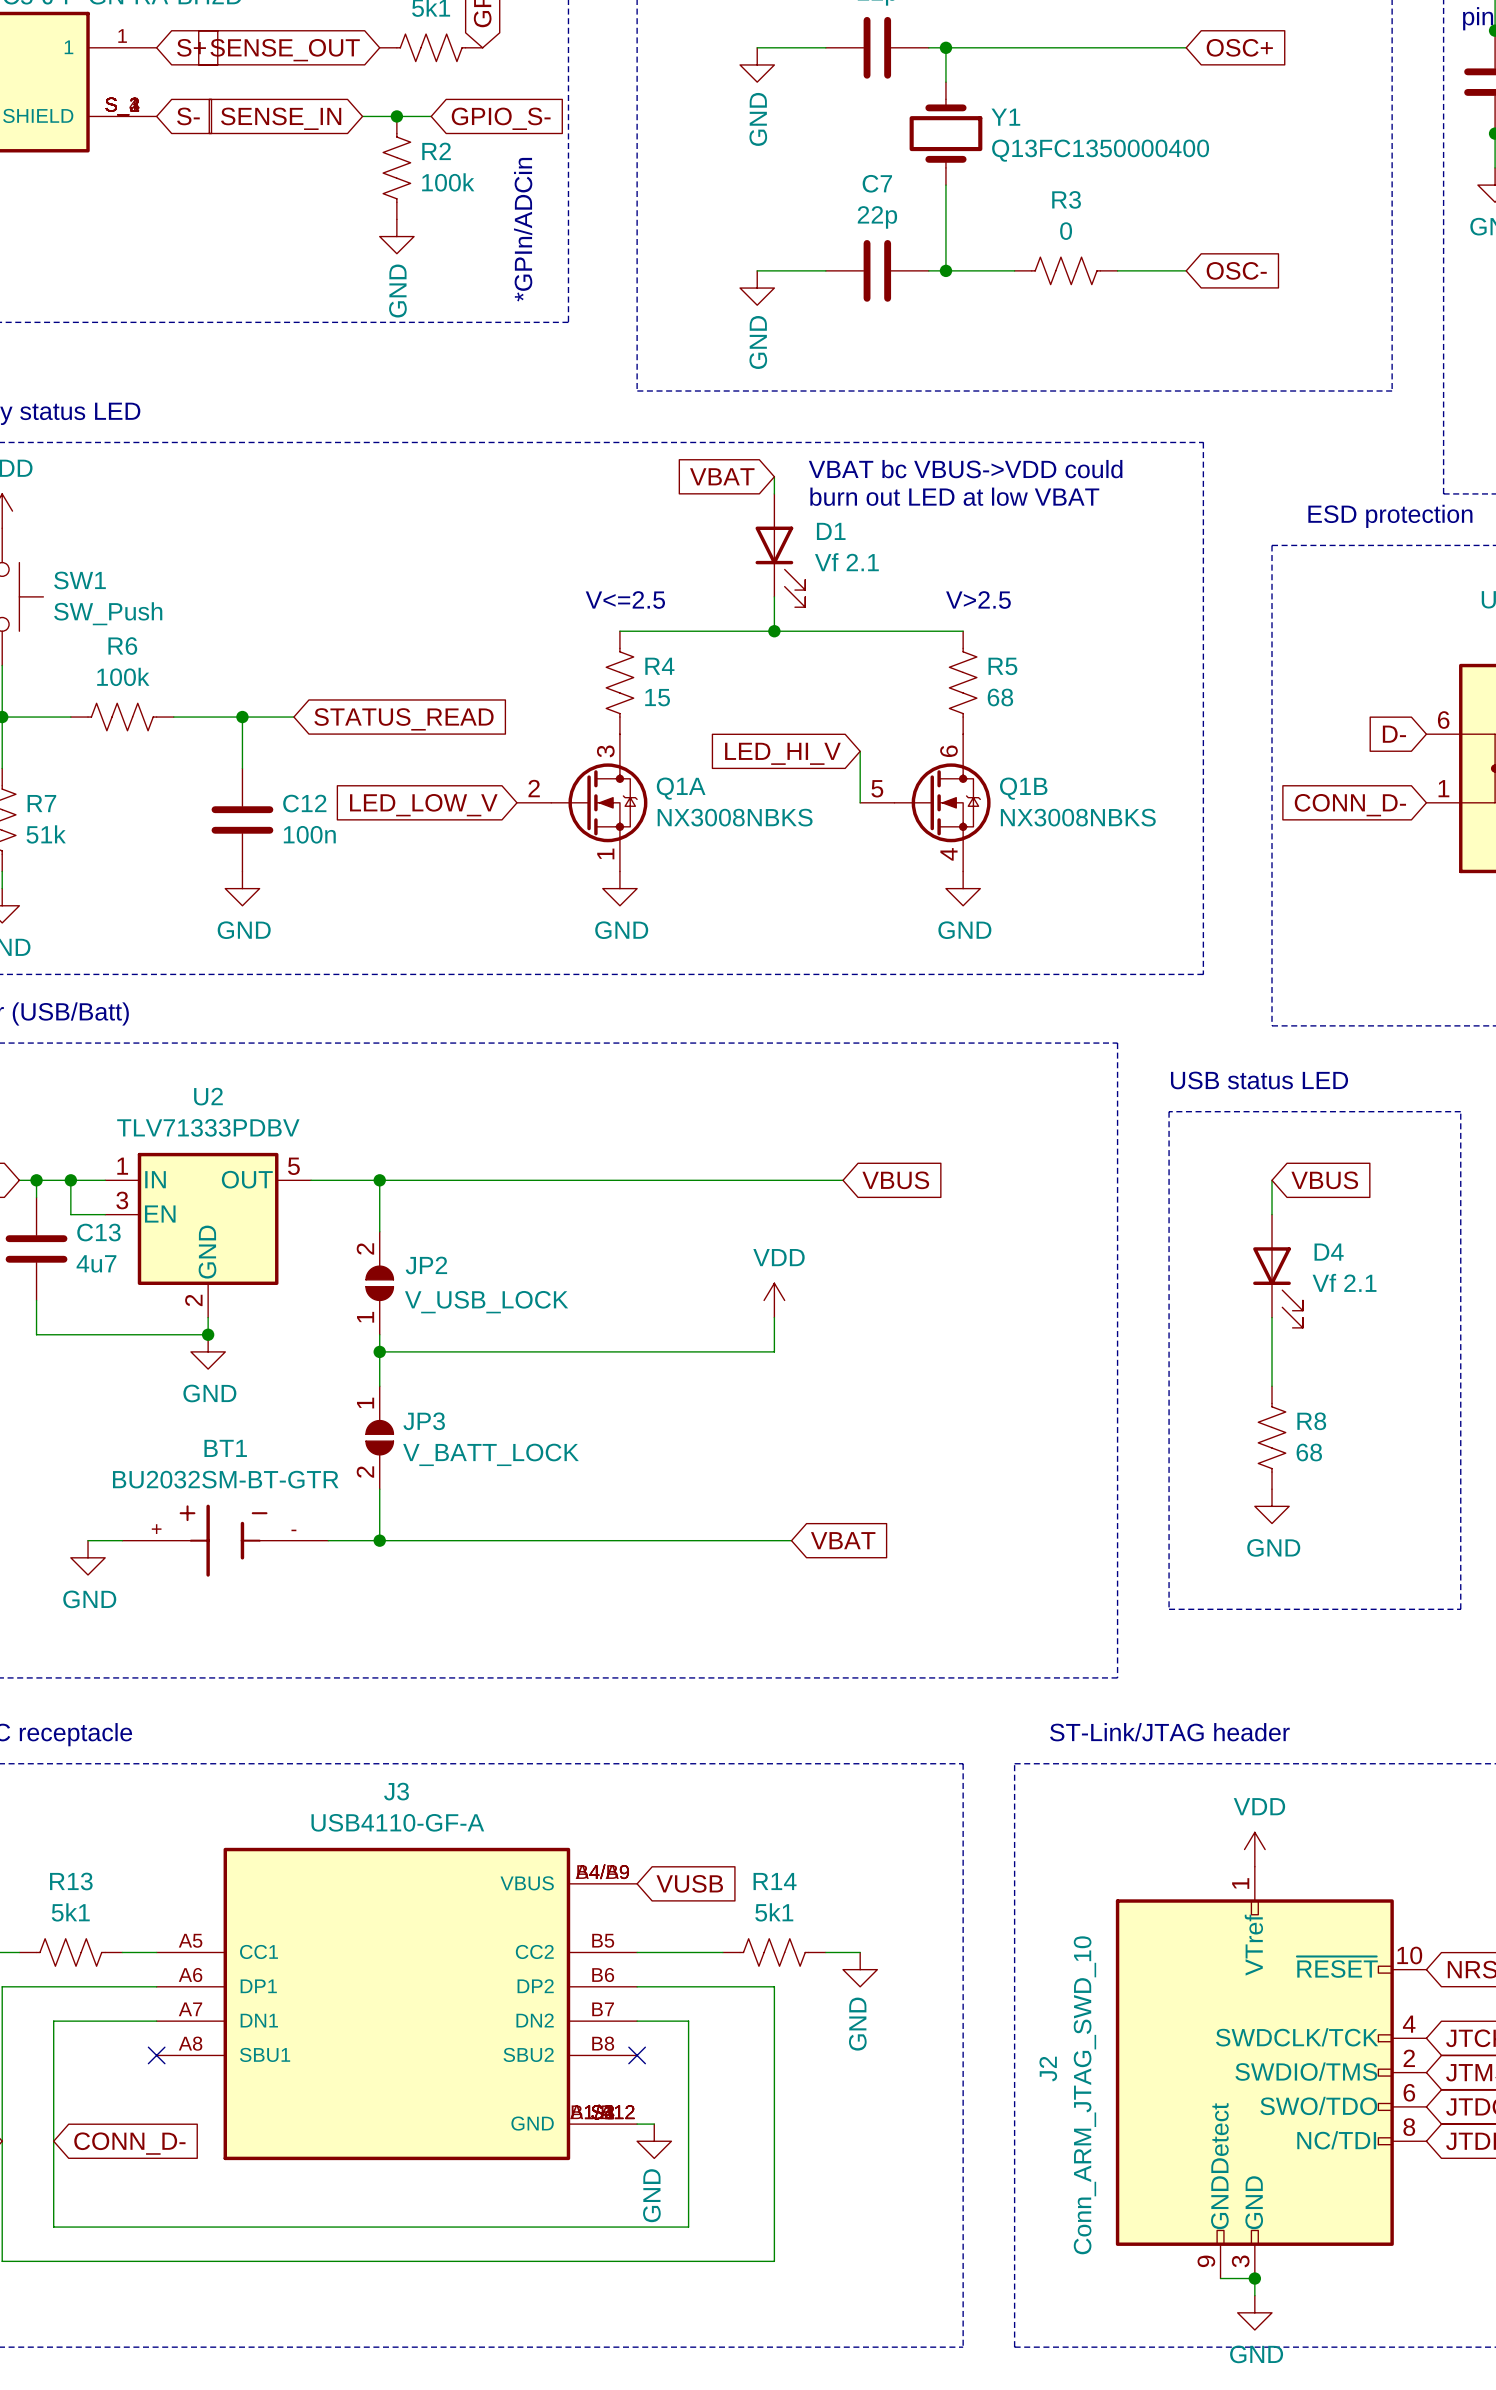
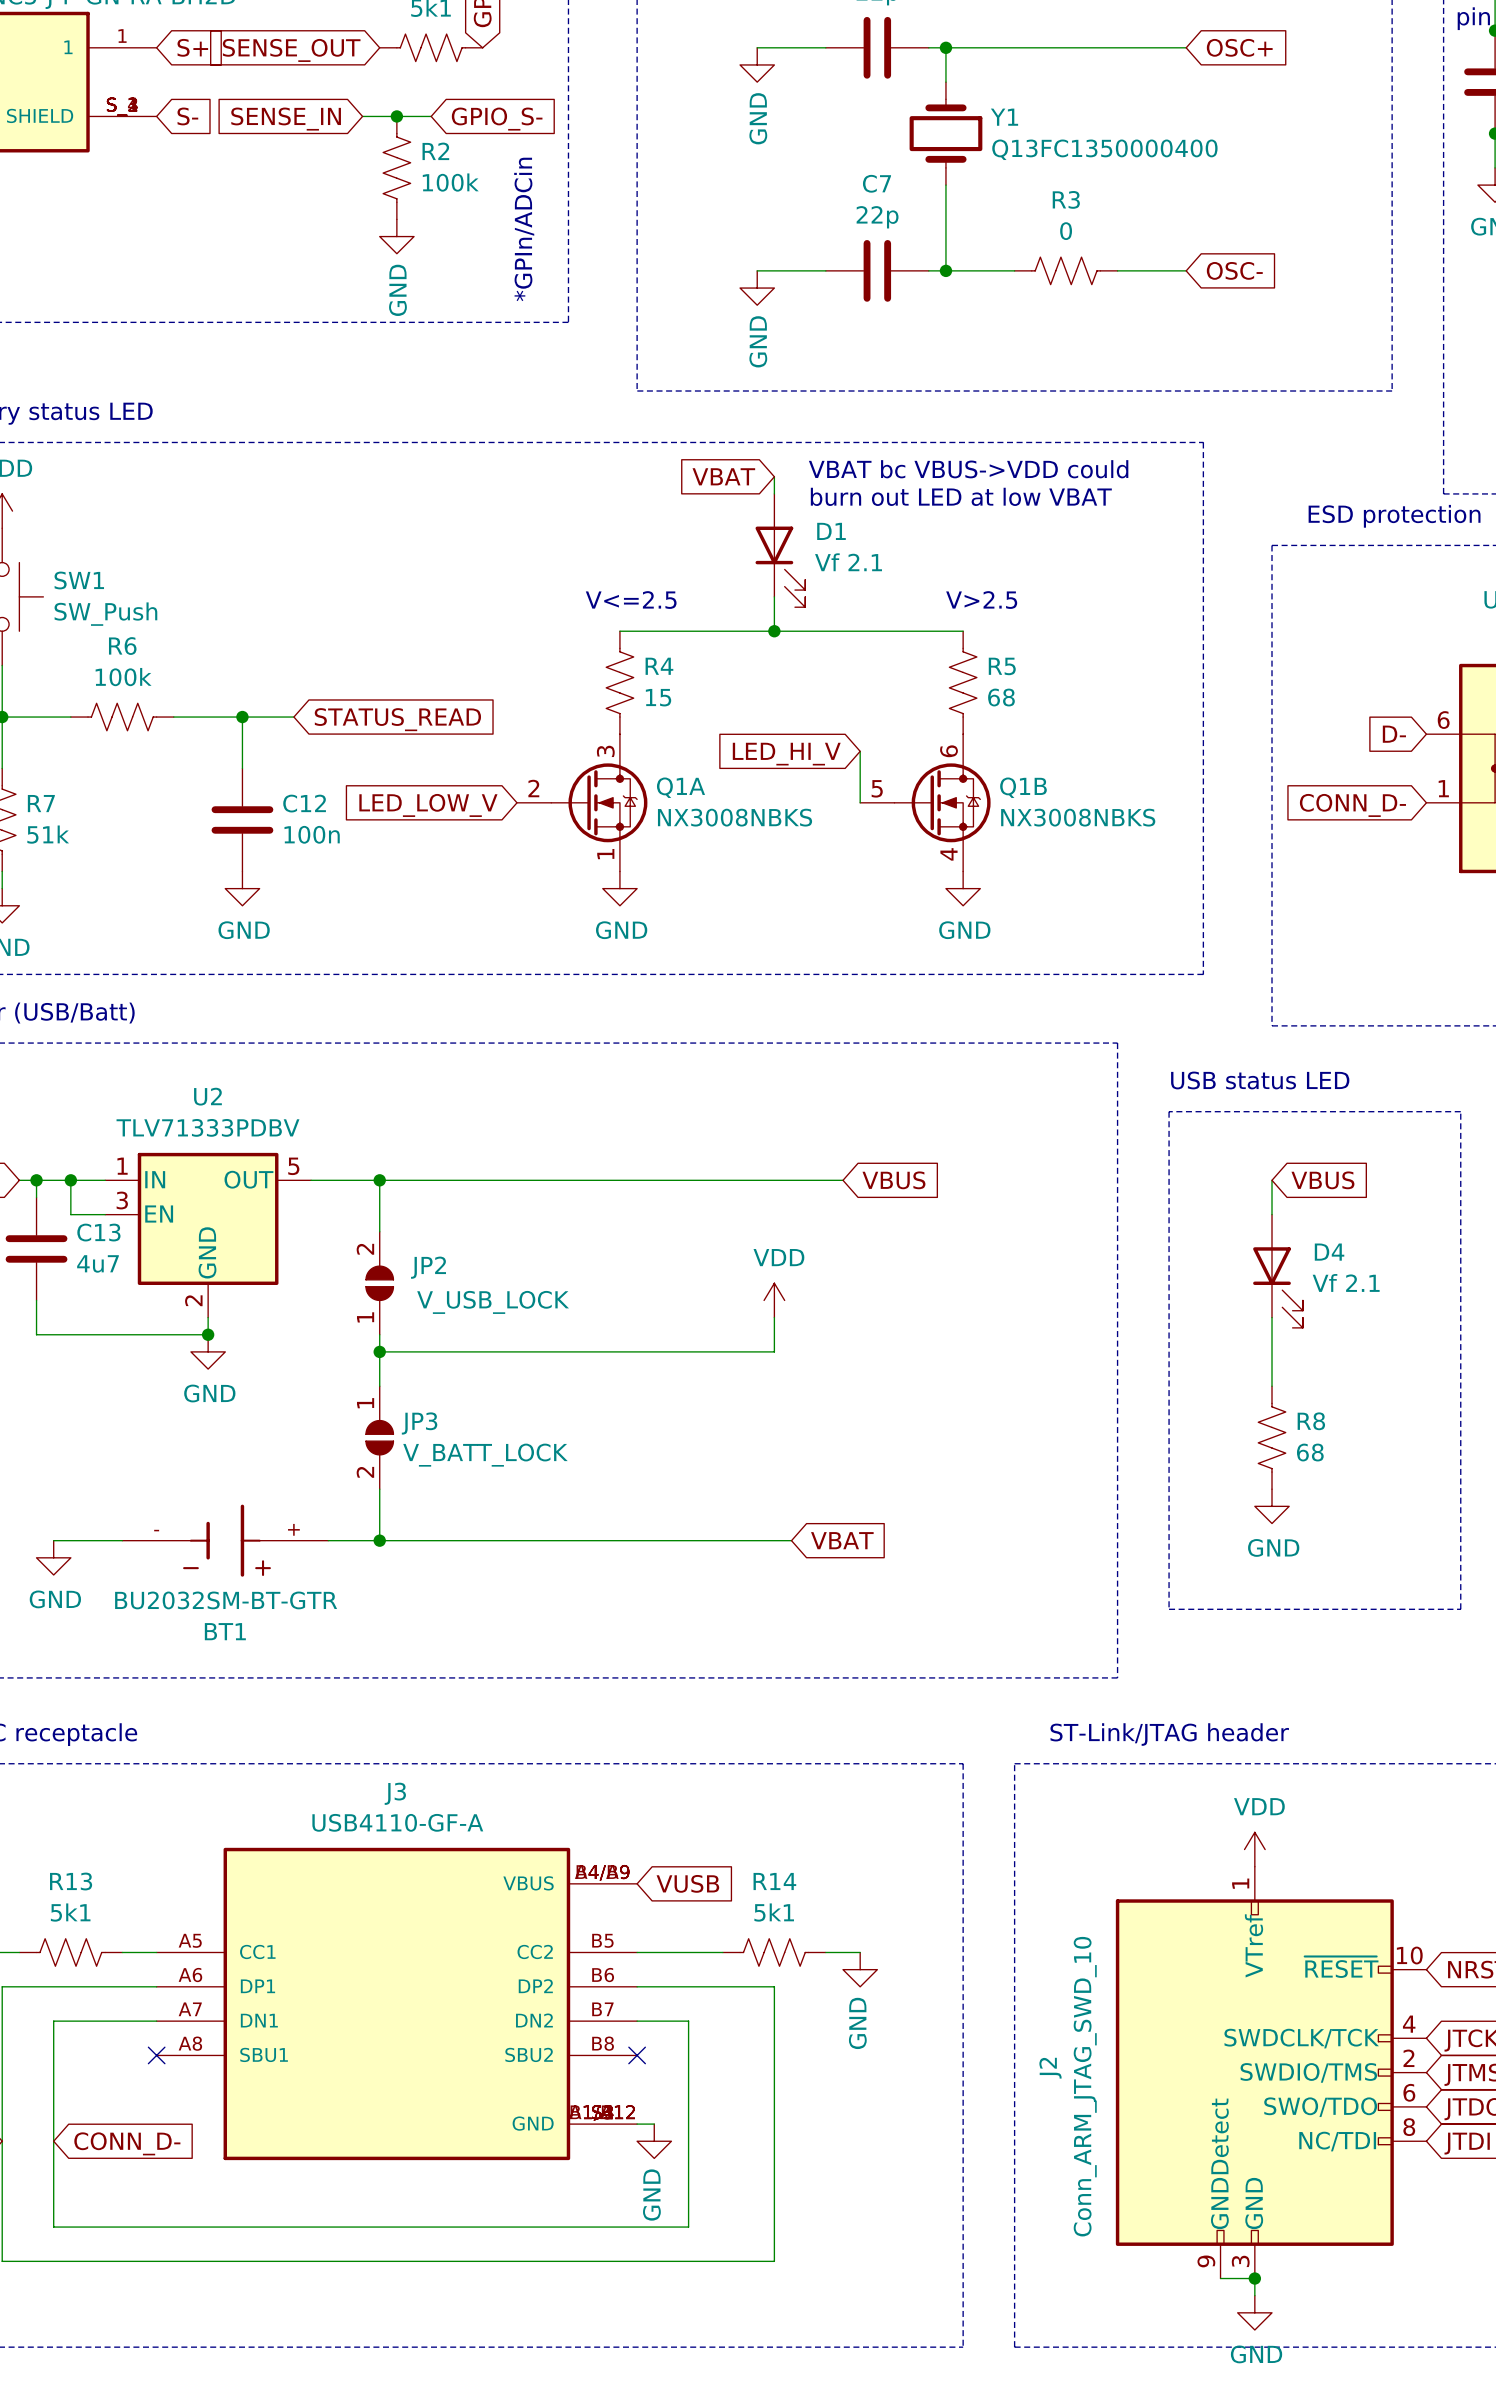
wire: none -> (53, 1540) (88, 1540)
BT1 rotation: 0° (223, 1540) -> 180° (227, 1540)
power symbol position: GND (88, 1557) -> GND (53, 1557)

